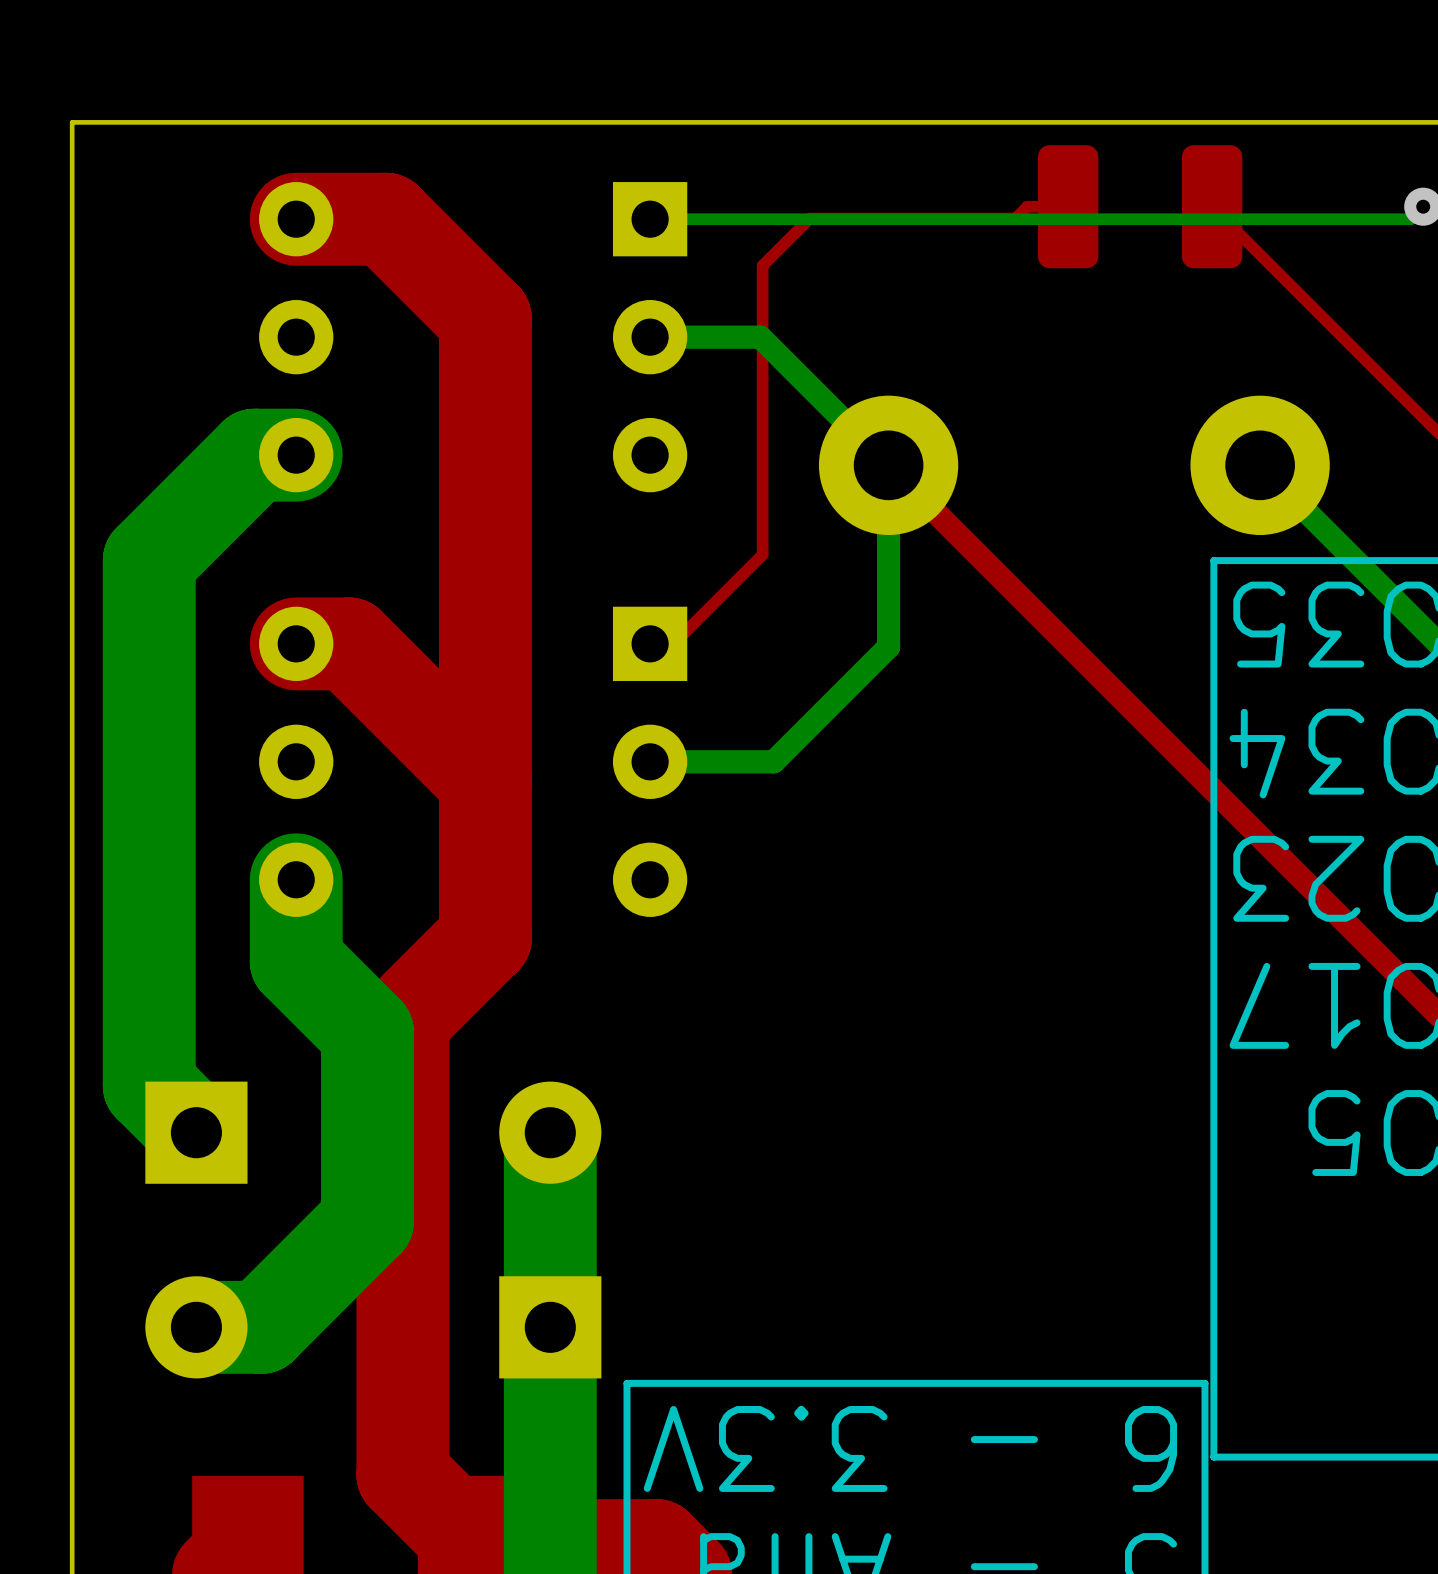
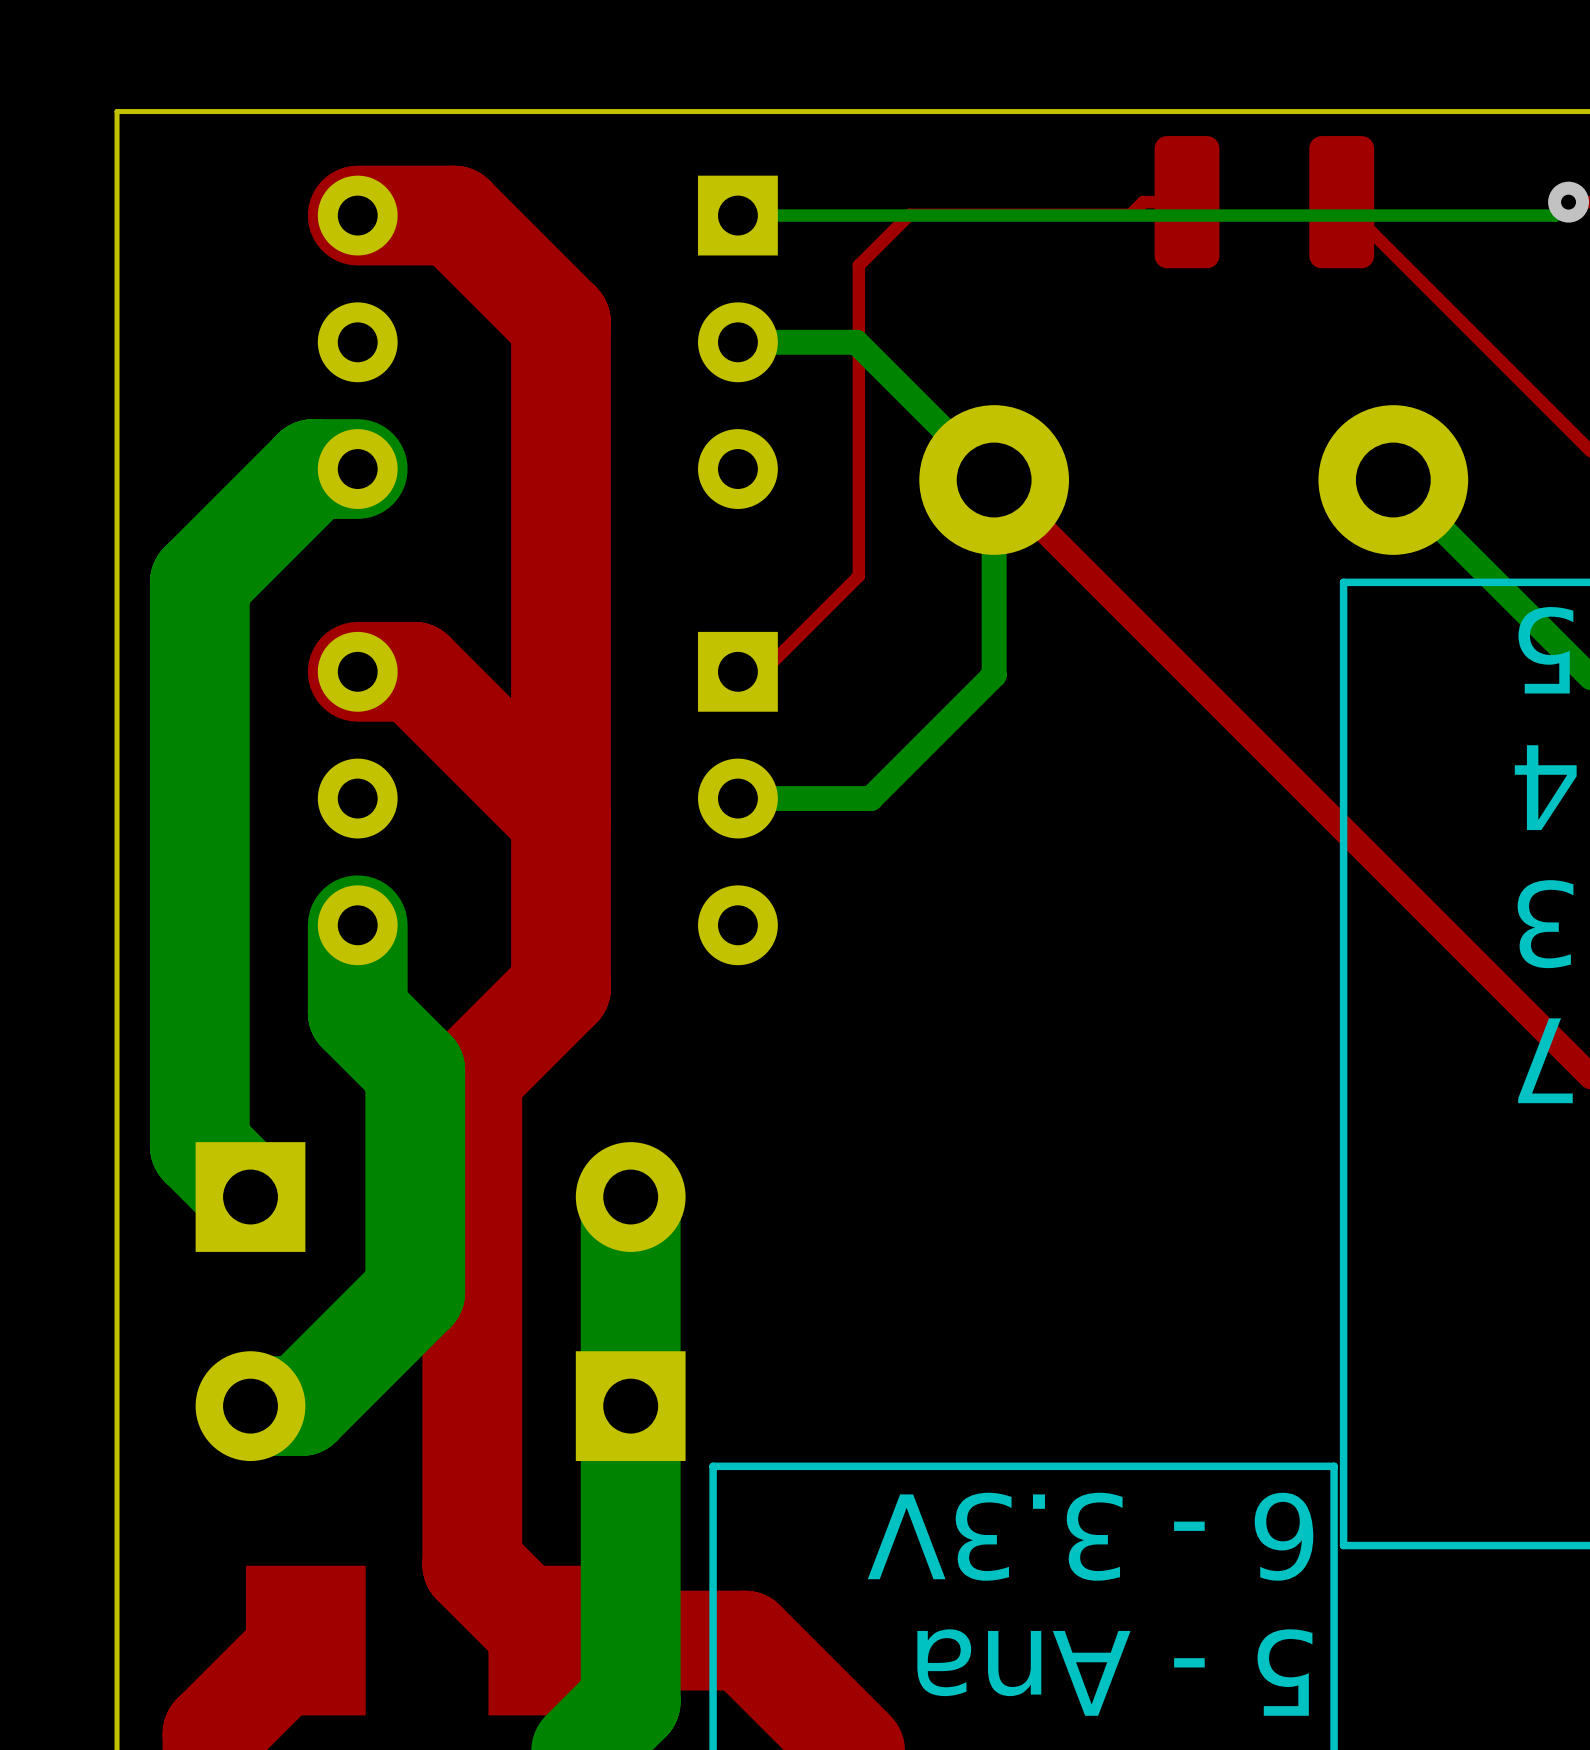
bottom track: (349, 1014) (367, 1032) (367, 1221) (261, 1327) (243, 1327) -> (415, 1070) (415, 1292) (301, 1406)

